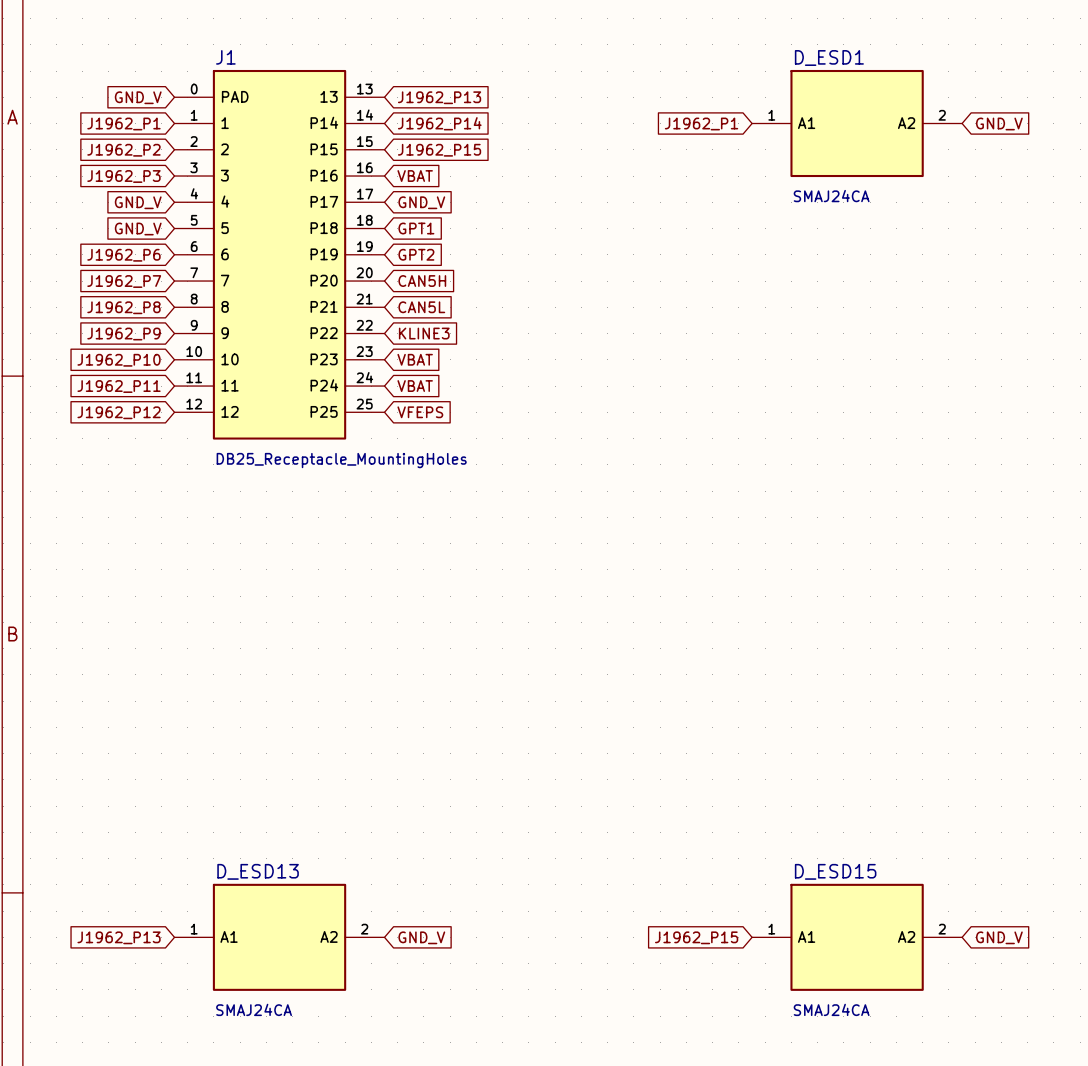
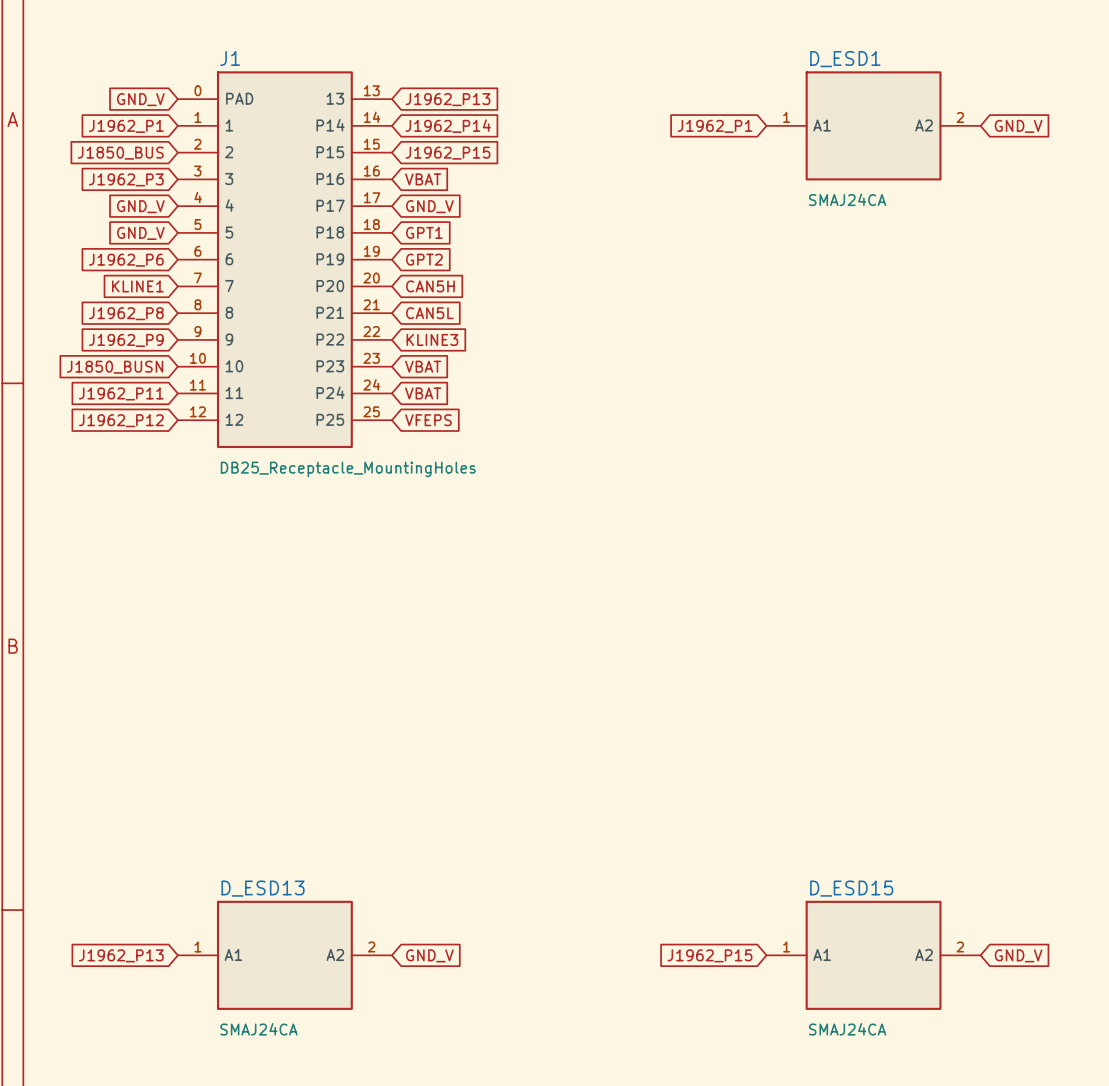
global label: J1962_P2 (123, 150) -> J1850_BUS (120, 153)
global label: J1962_P7 (124, 281) -> KLINE1 (137, 286)
global label: J1962_P10 (119, 360) -> J1850_BUSN (115, 367)

